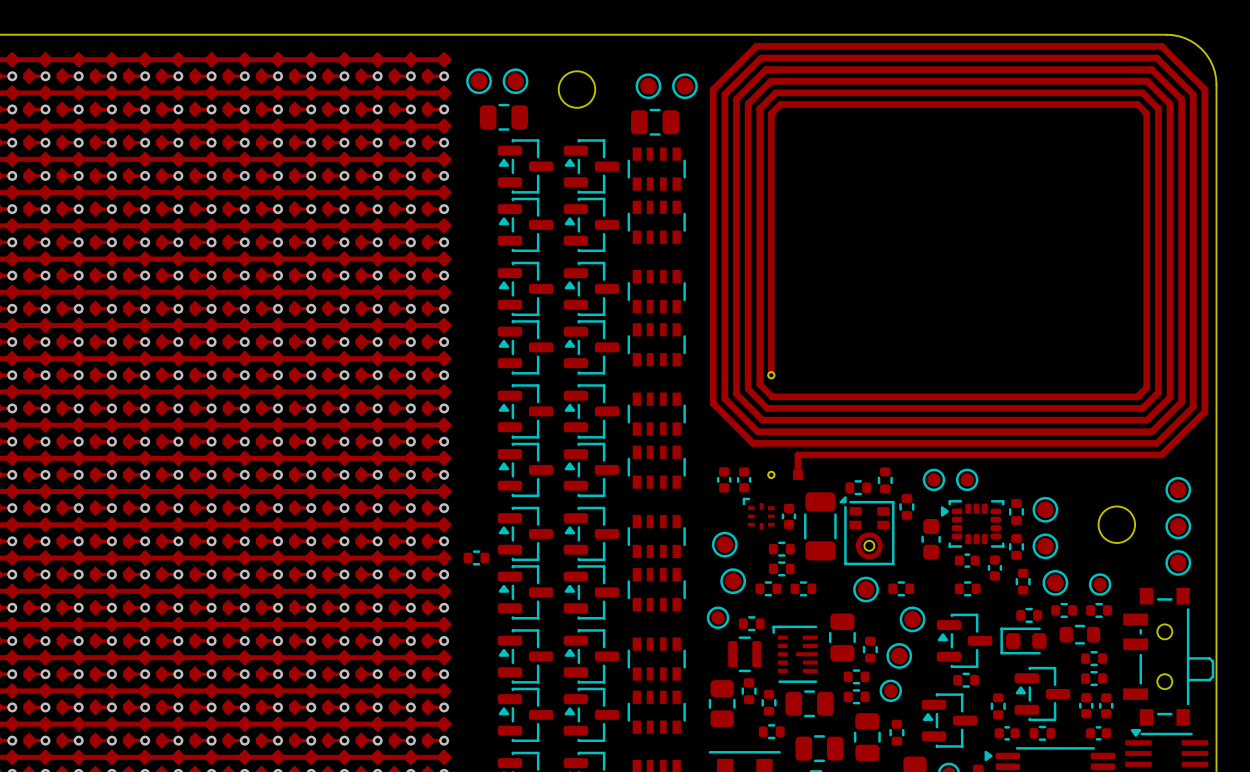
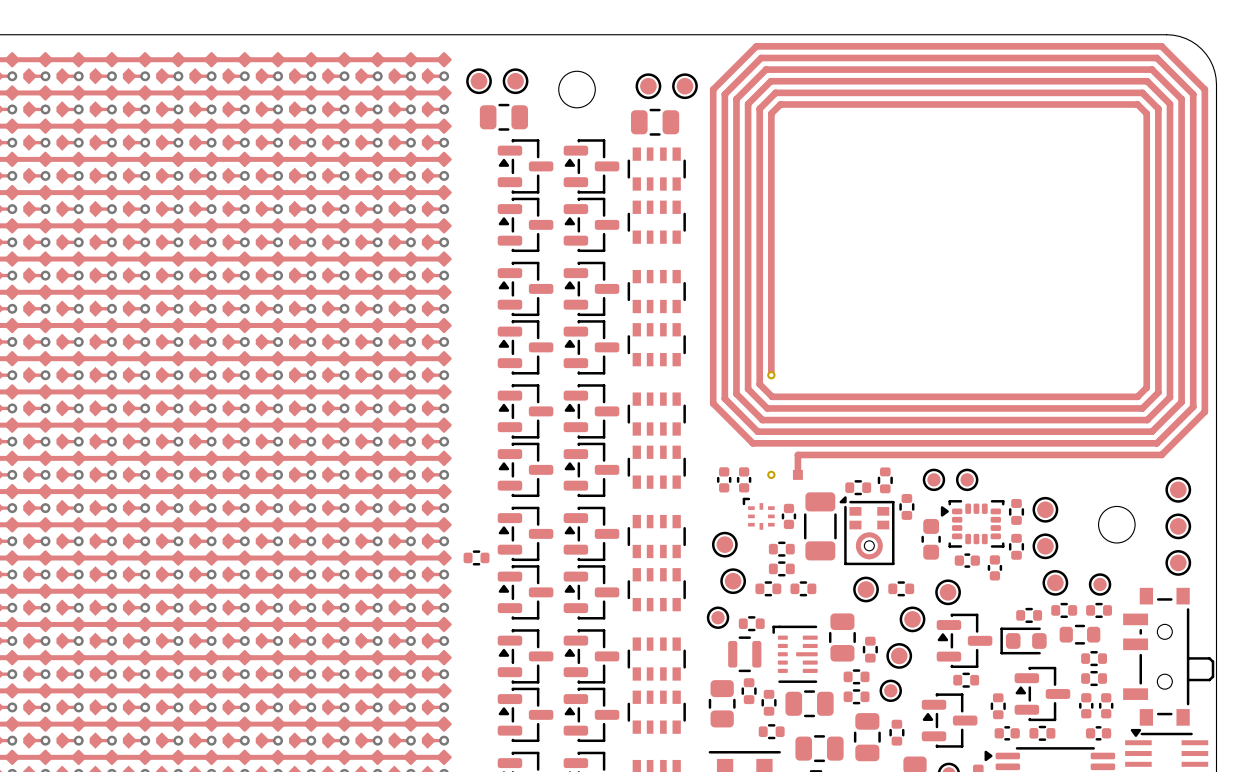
part: (1023, 581) -> none
part: (967, 588) -> none
part: none -> (948, 592)

